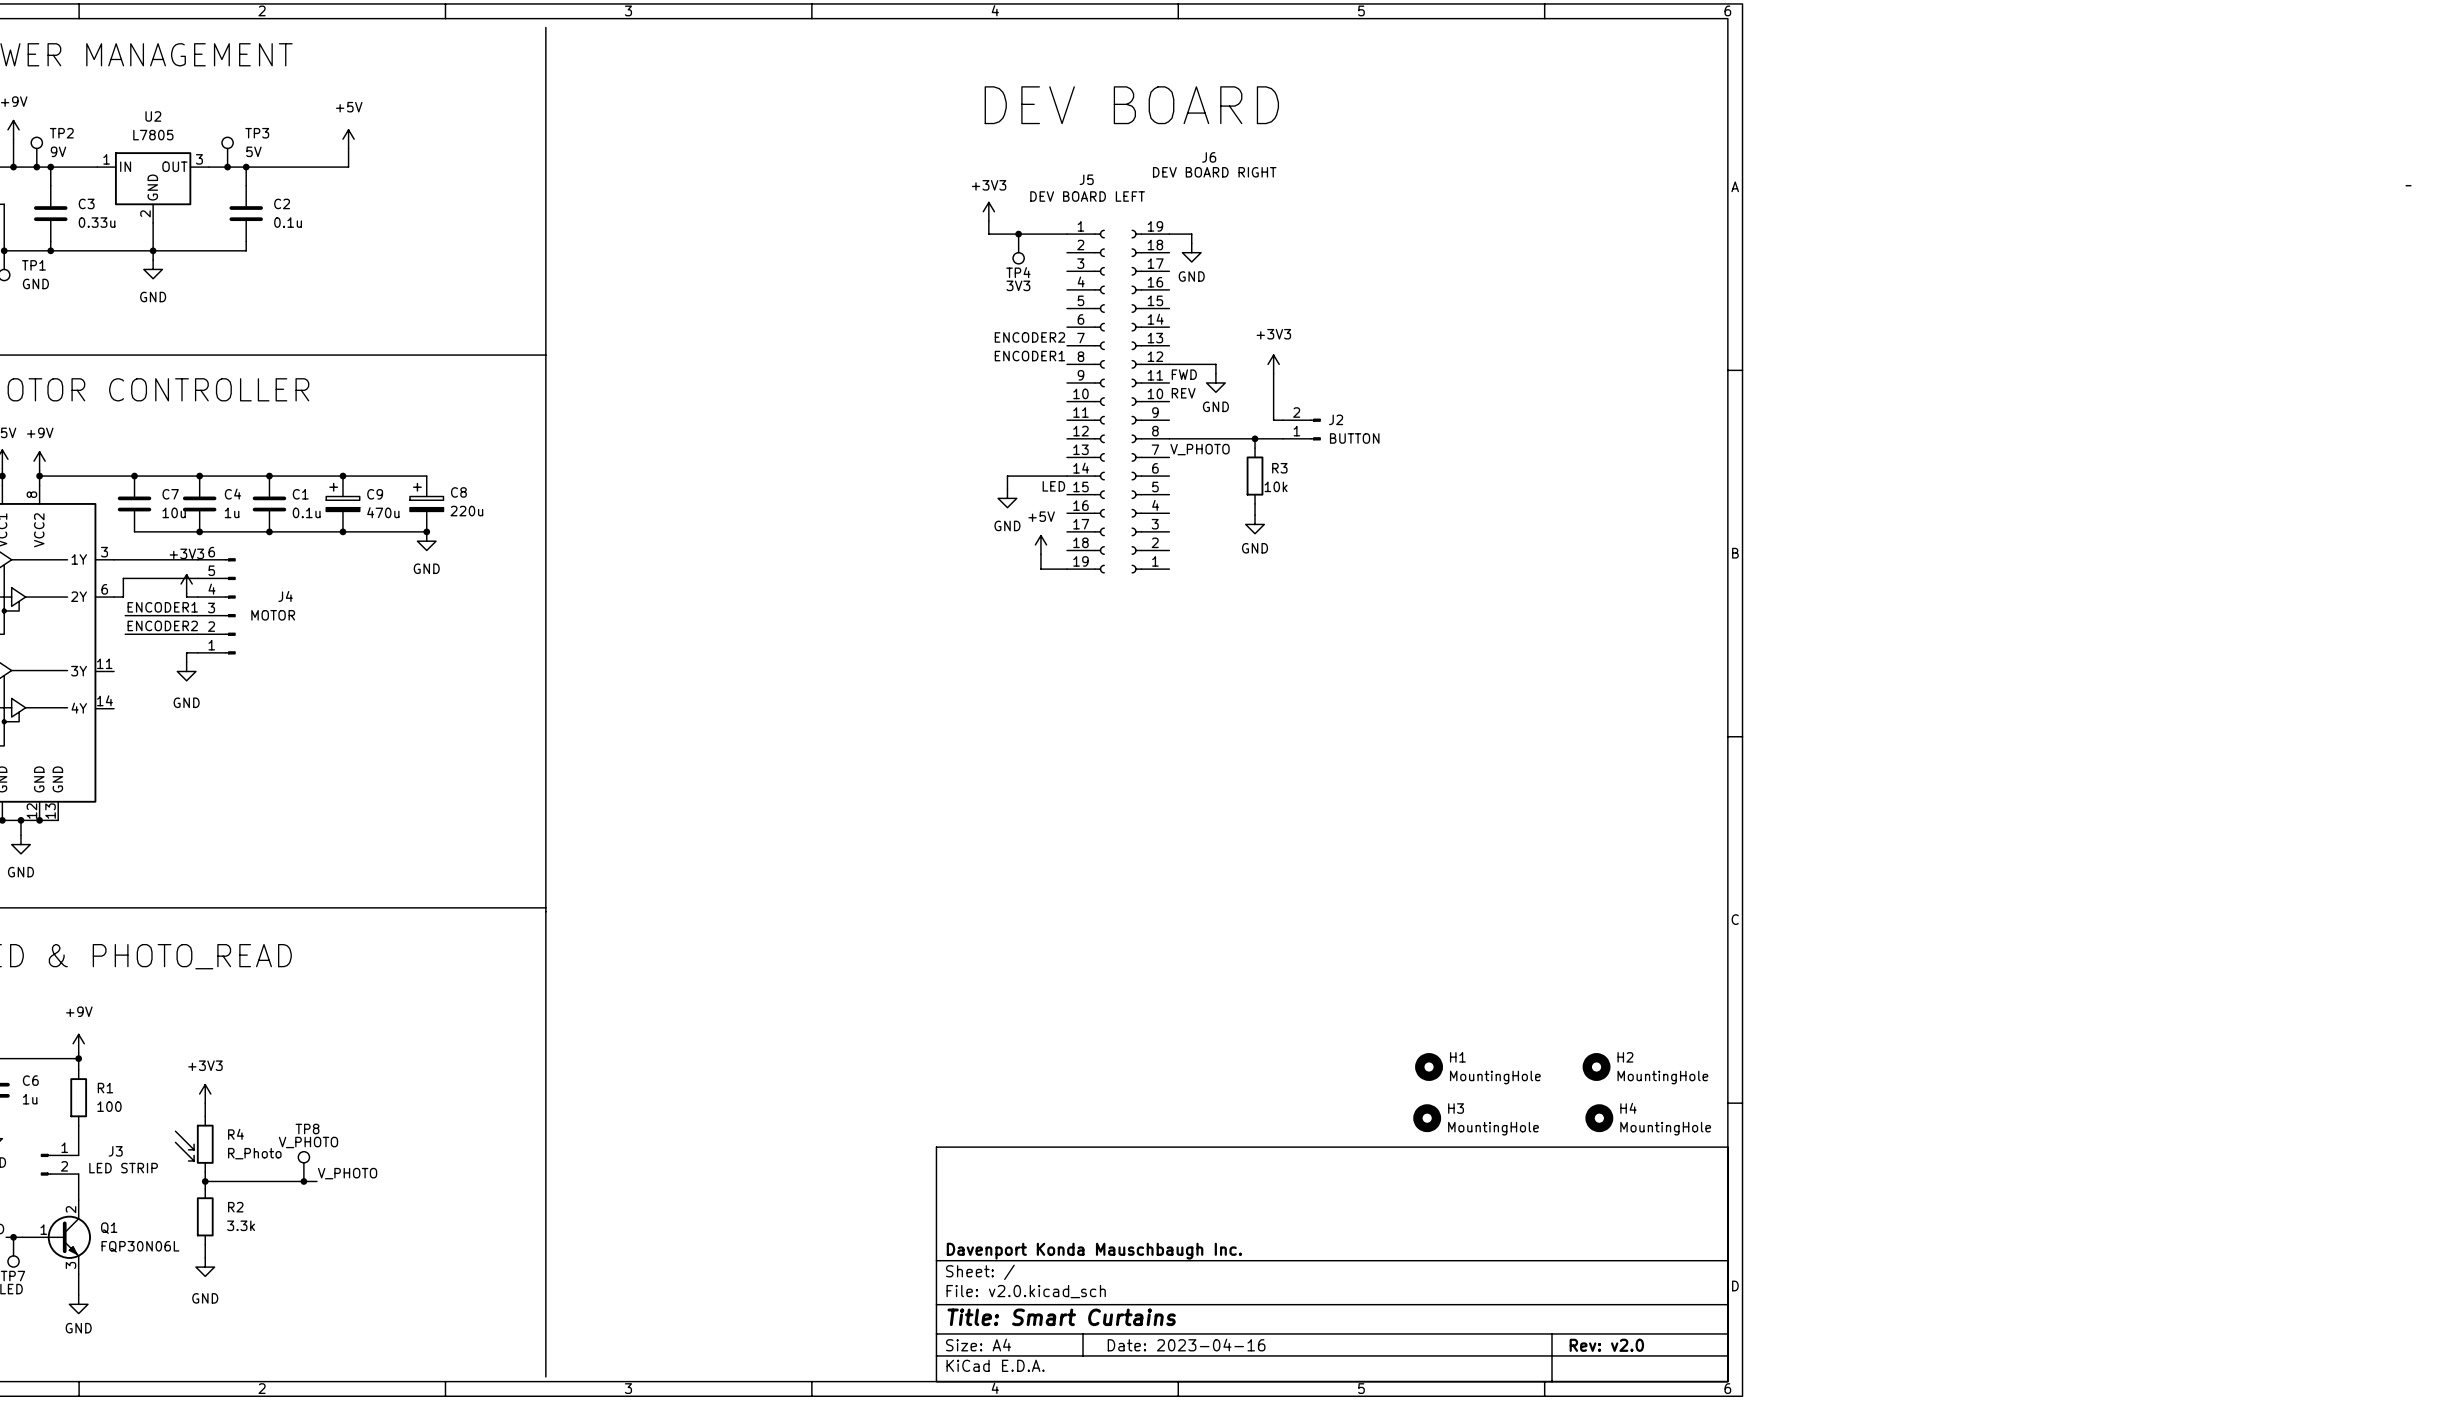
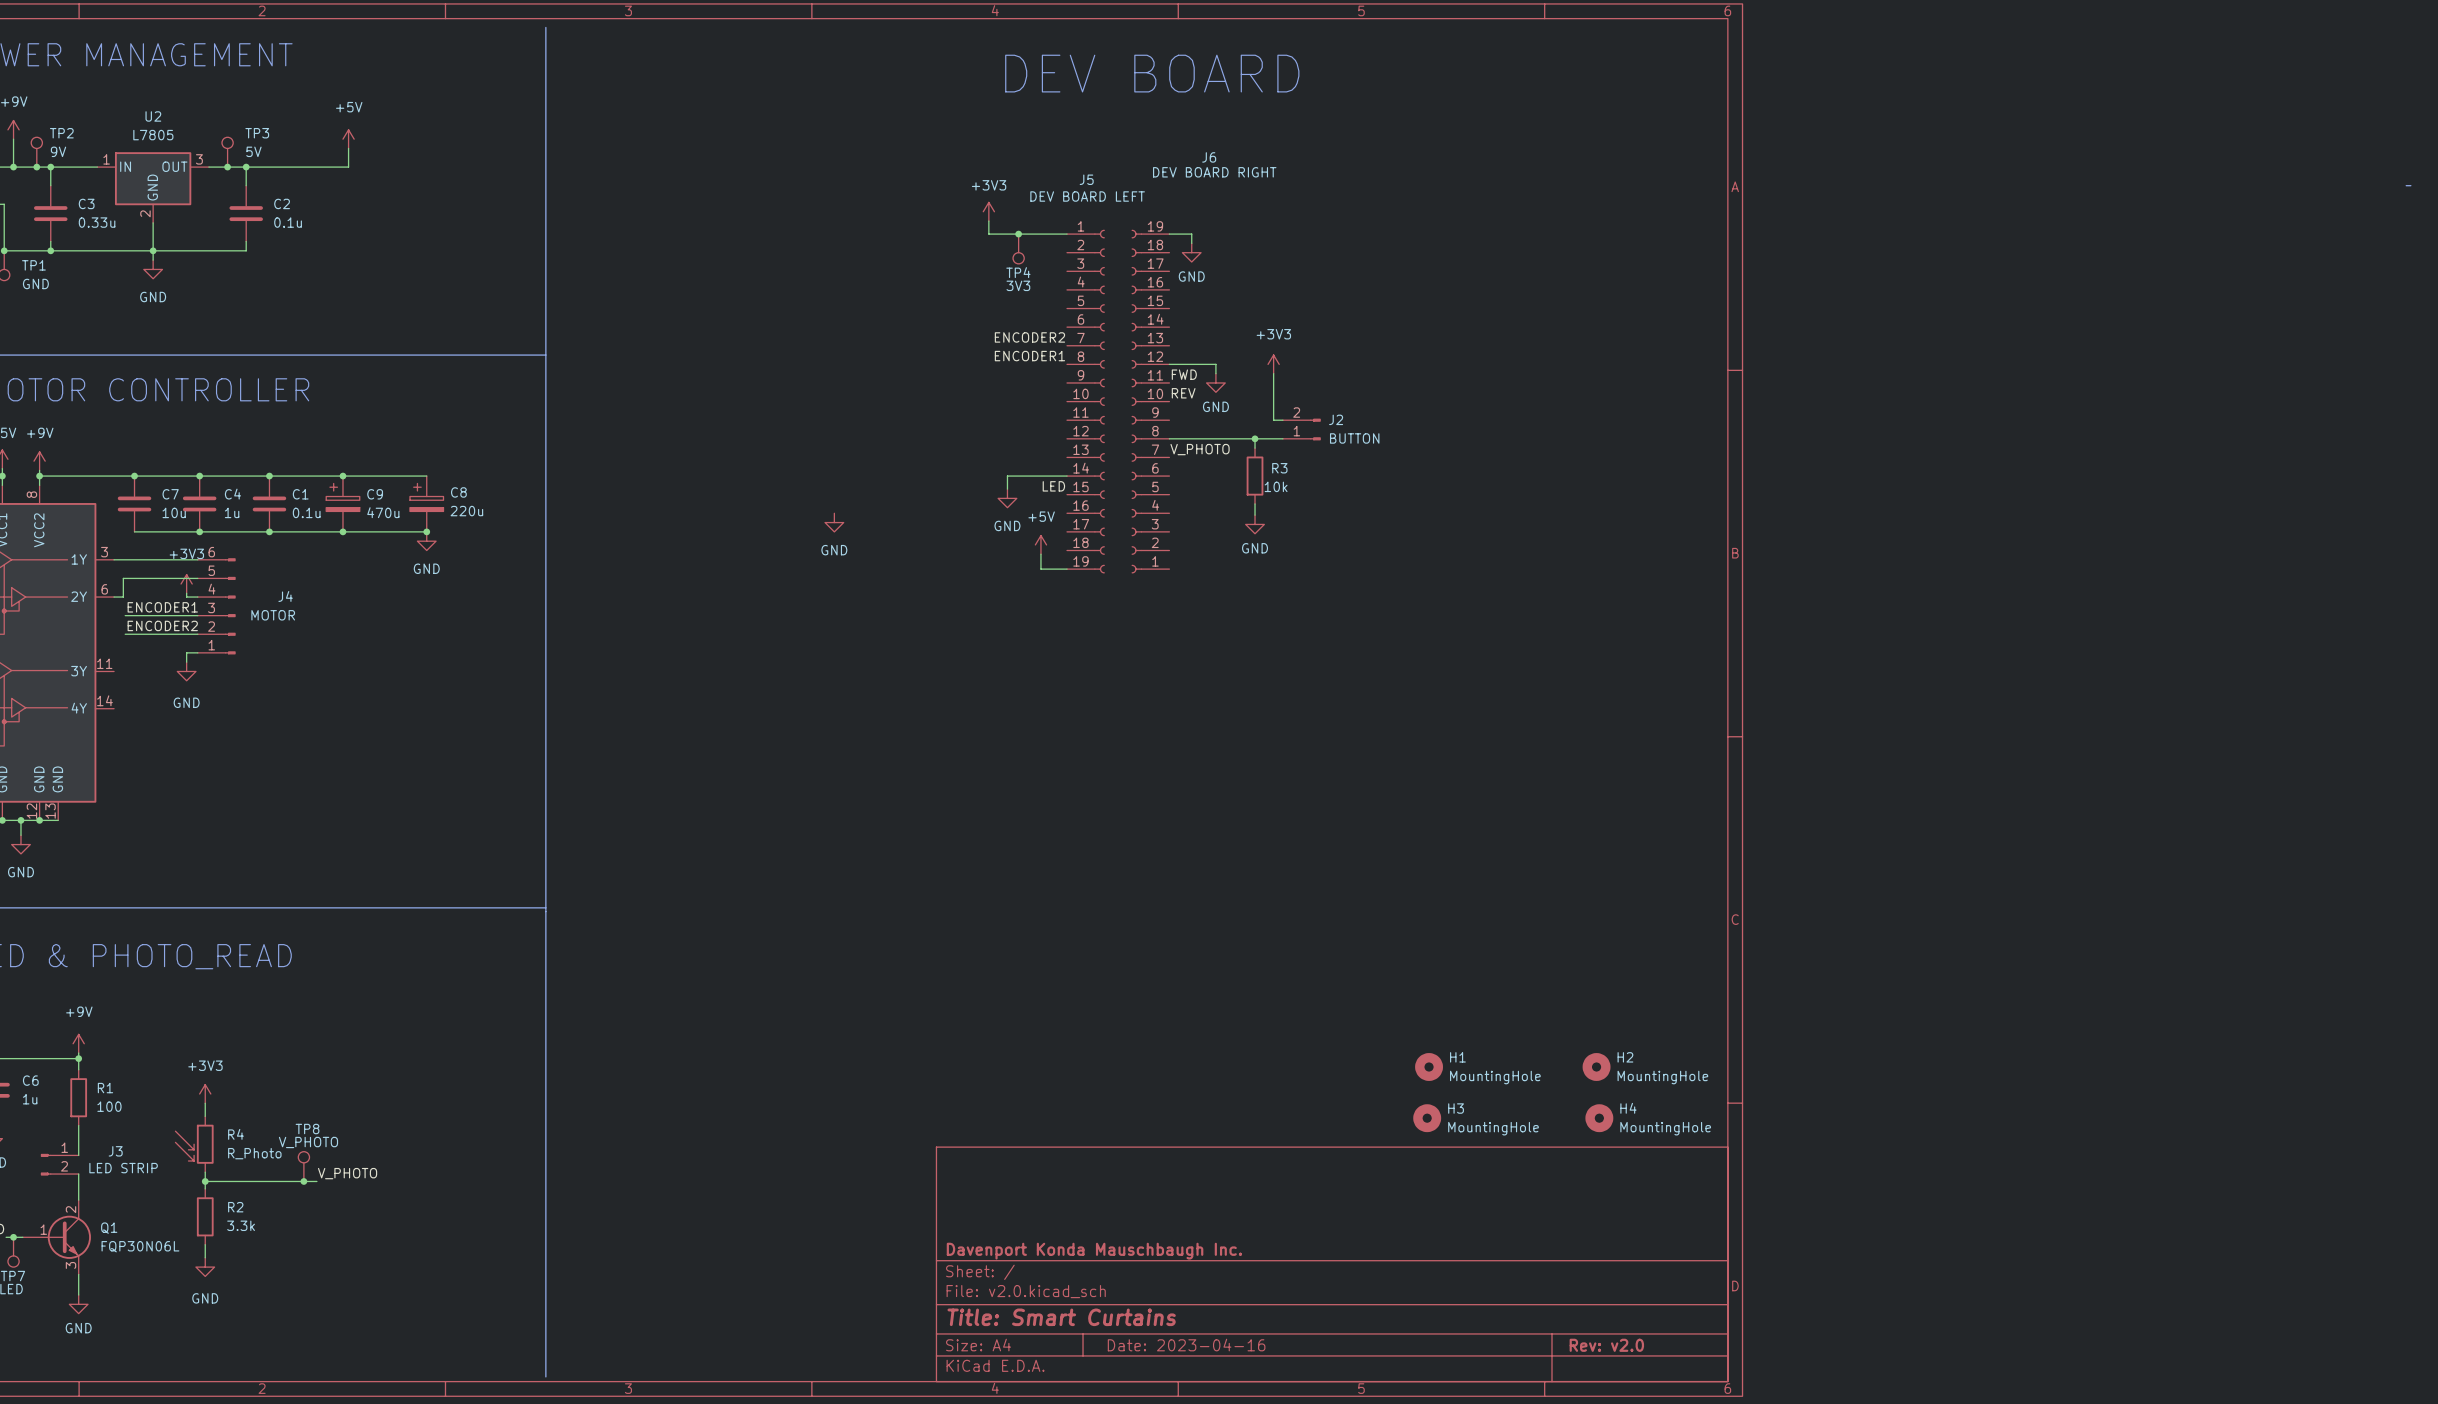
text position: DEV BOARD (1131, 105) -> DEV BOARD (1152, 73)
power symbol: none -> GND (834, 522)

